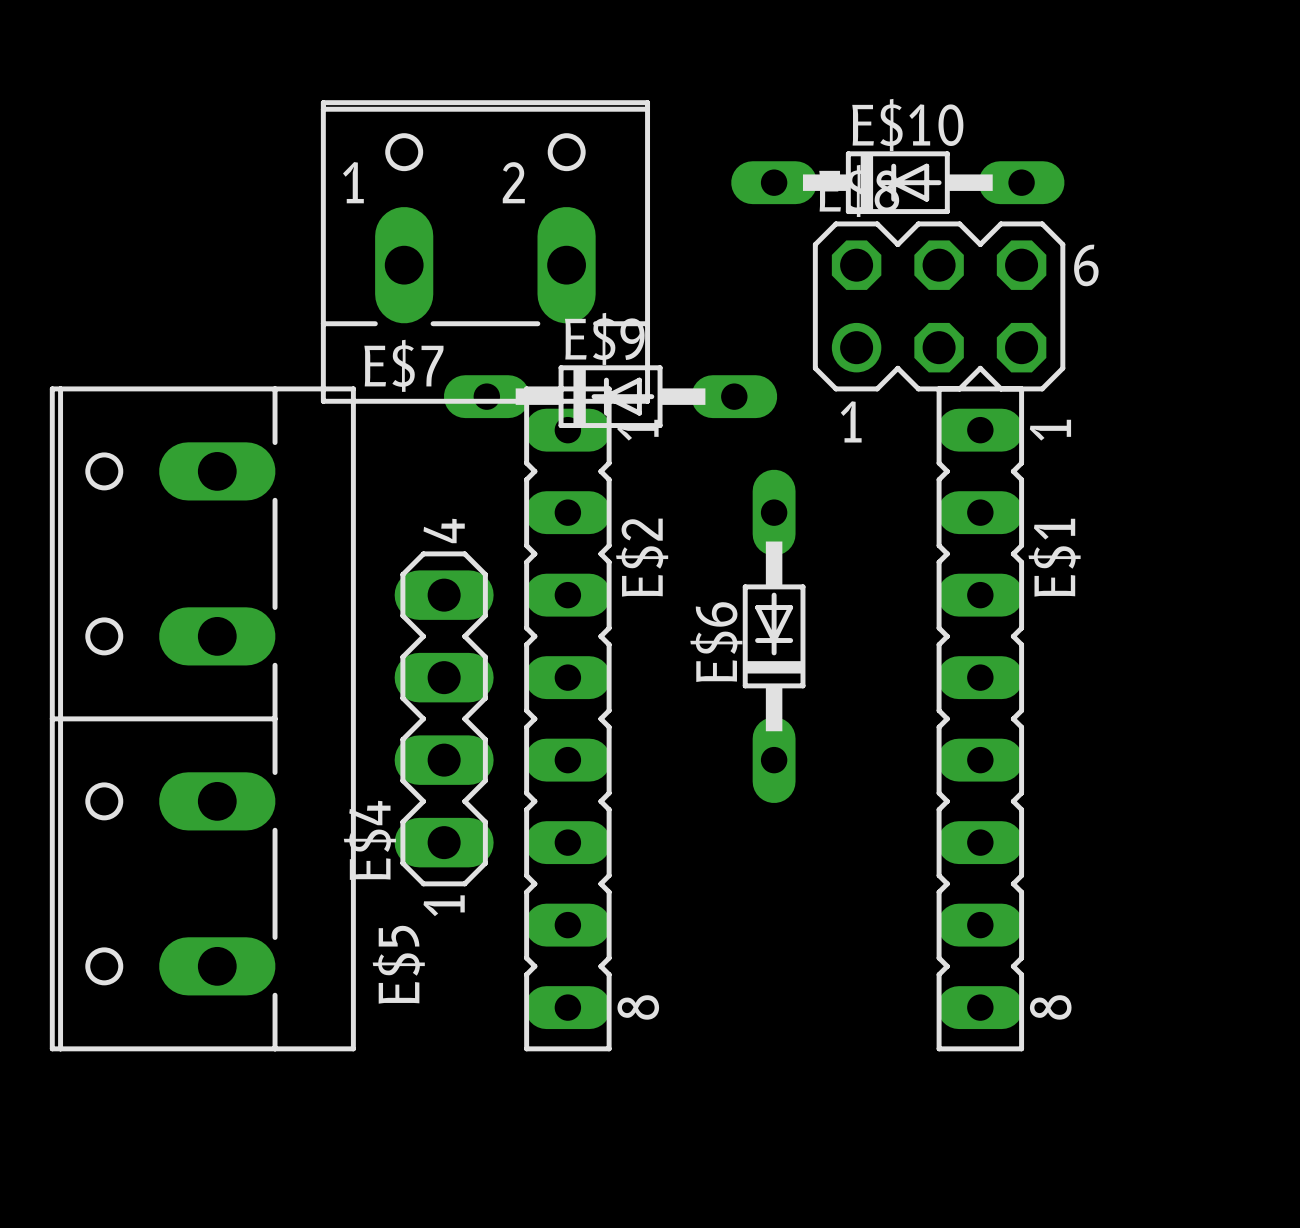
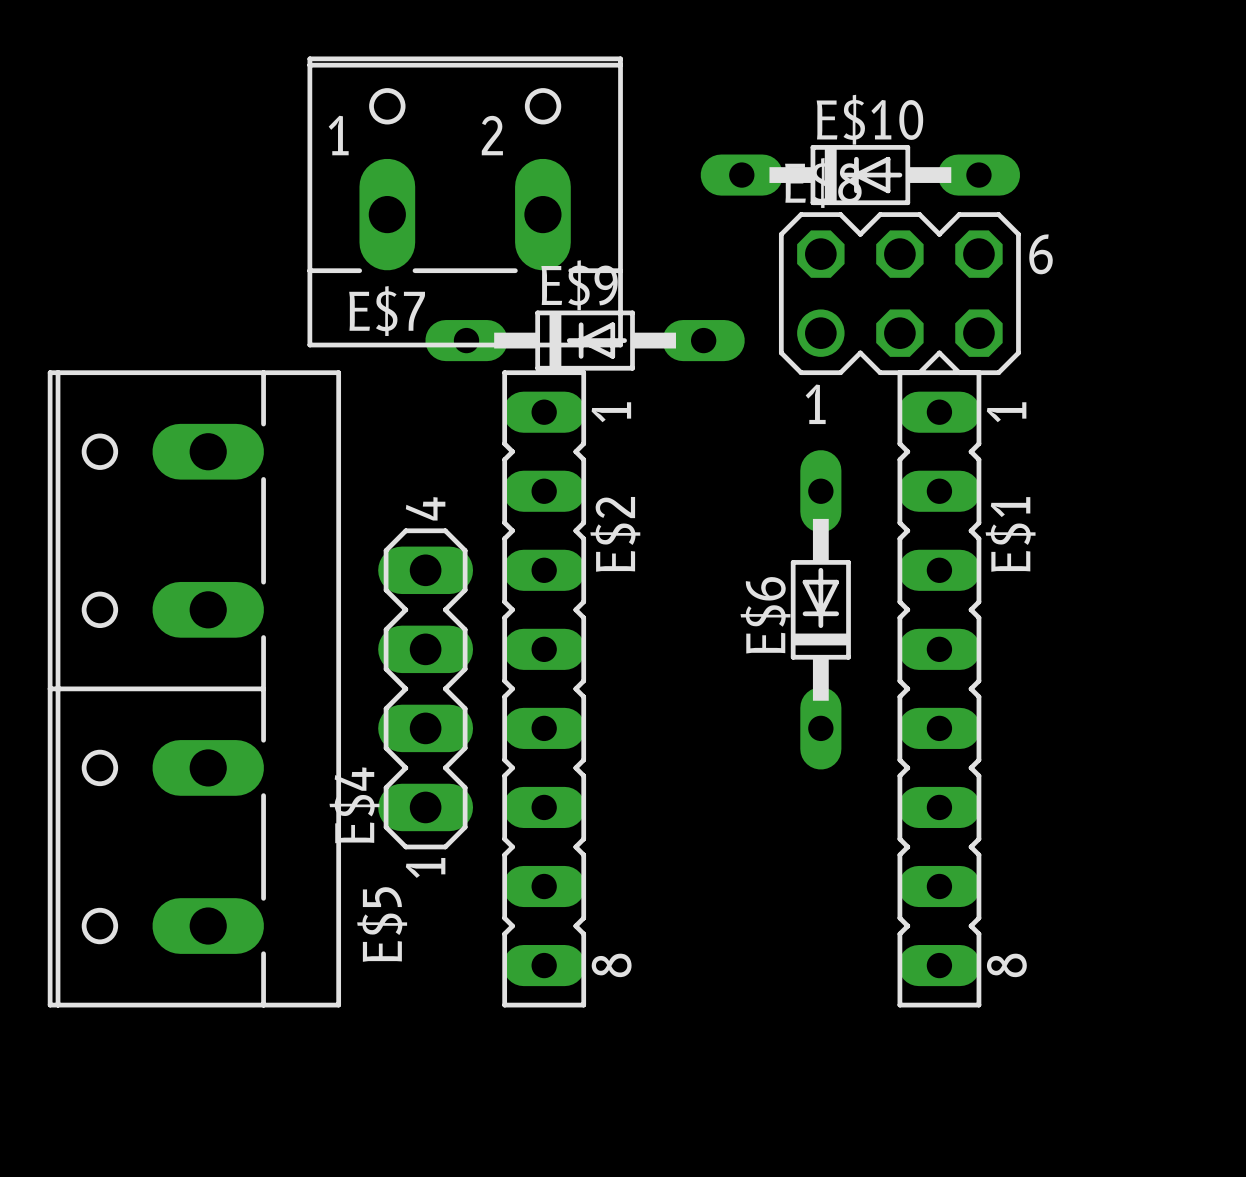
E$7 position: (485, 251) -> (465, 201)
E$9 position: (610, 396) -> (585, 340)
E$6 position: (774, 636) -> (820, 609)

